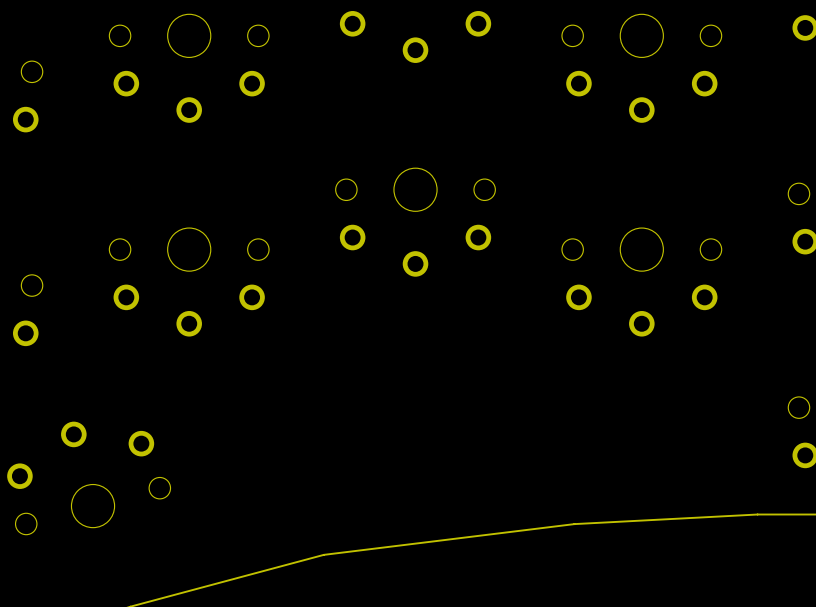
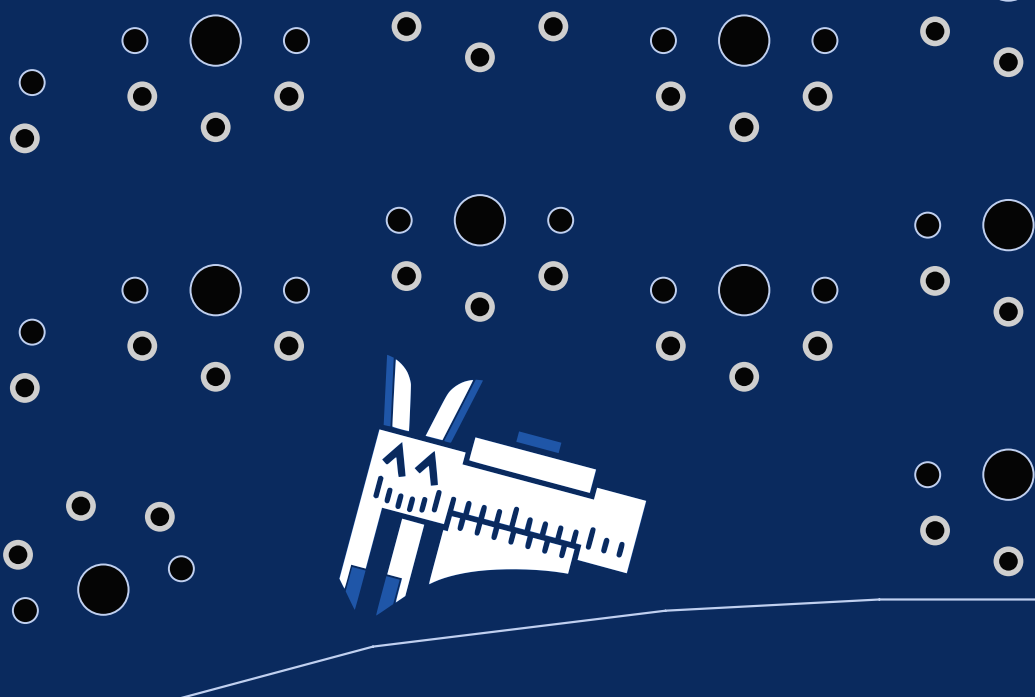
drawing: none -> [339, 354, 647, 616]

